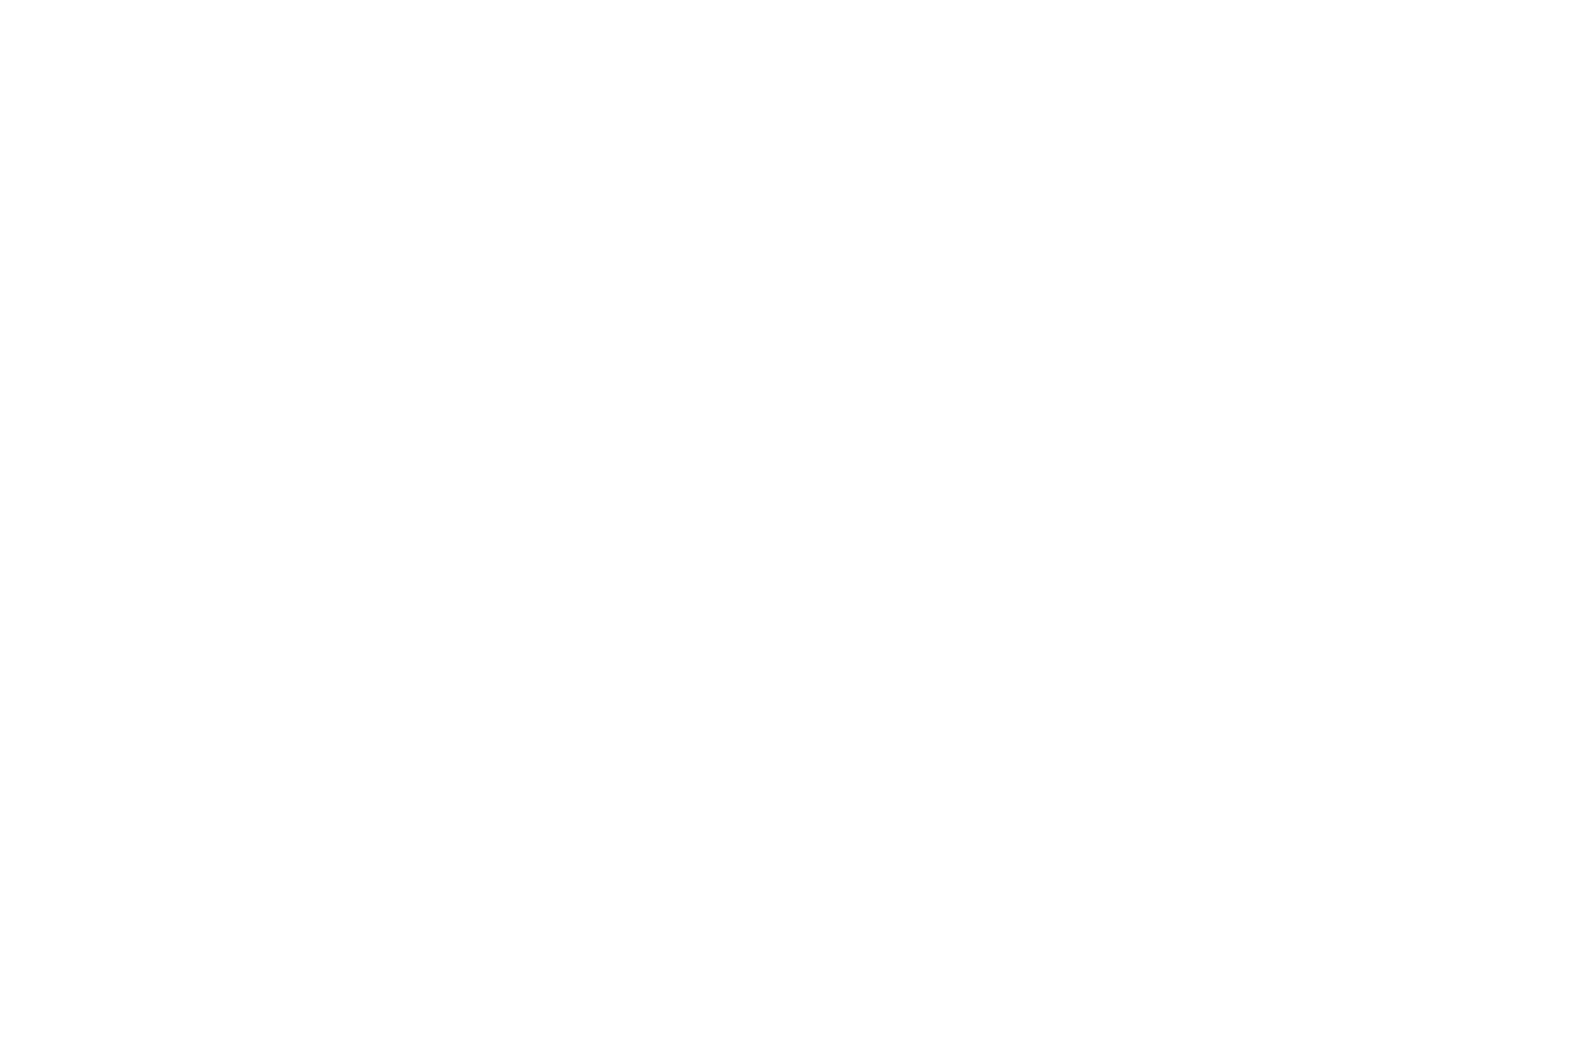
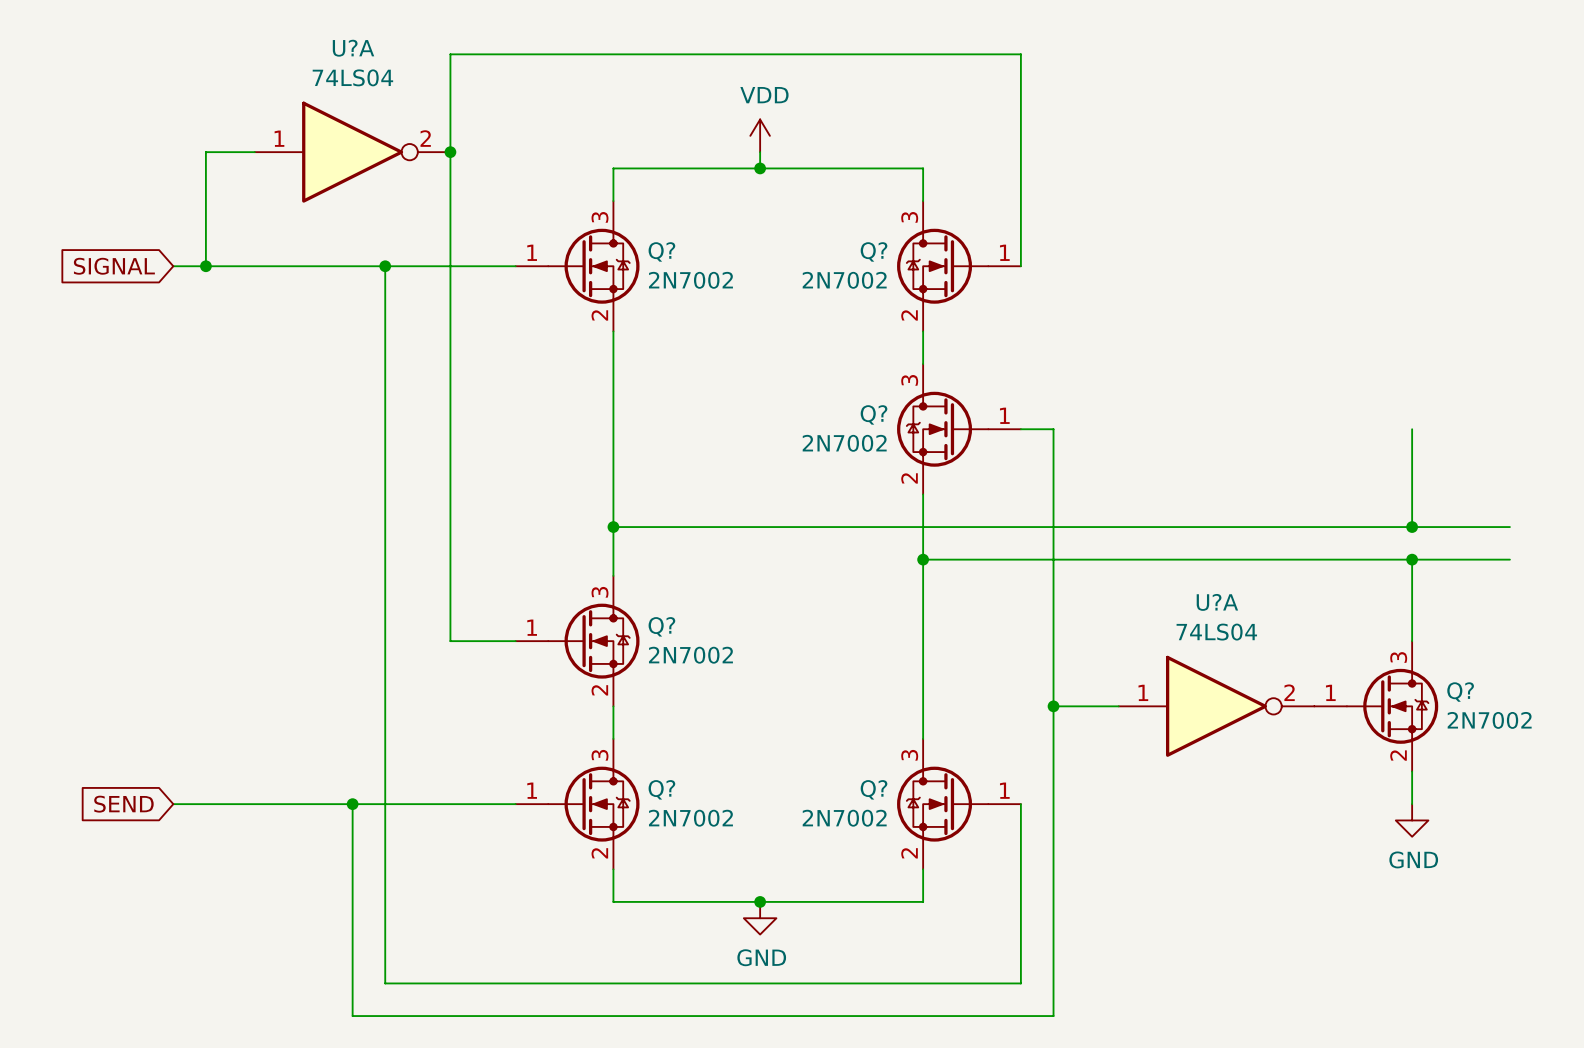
power symbol: none -> VDD (760, 135)
wire: none -> (254, 152) (205, 152) (205, 266)
U?A: none -> 74LS04 (352, 152)
junction: none -> (450, 152)
wire: none -> (760, 152) (760, 168)
junction: none -> (760, 168)
wire: none -> (613, 201) (613, 168) (923, 168) (923, 201)
global label: none -> SIGNAL (114, 266)
wire: none -> (173, 266) (515, 266)
junction: none -> (205, 266)
wire: none -> (385, 266) (385, 983) (1020, 983) (1020, 804)
junction: none -> (385, 266)
Q?: none -> 2N7002 (577, 266)
Q?: none -> 2N7002 (958, 266)
wire: none -> (1020, 266) (1020, 54) (450, 54) (450, 641) (515, 641)
wire: none -> (613, 331) (613, 575)
wire: none -> (923, 331) (923, 364)
Q?: none -> 2N7002 (958, 429)
wire: none -> (1020, 429) (1053, 429) (1053, 1016) (352, 1016) (352, 804)
wire: none -> (1412, 429) (1412, 527)
wire: none -> (923, 494) (923, 738)
wire: none -> (613, 527) (1509, 527)
junction: none -> (613, 527)
junction: none -> (1412, 527)
wire: none -> (923, 559) (1509, 559)
junction: none -> (923, 559)
wire: none -> (1412, 559) (1412, 641)
junction: none -> (1412, 559)
Q?: none -> 2N7002 (577, 641)
wire: none -> (613, 706) (613, 738)
wire: none -> (1053, 706) (1118, 706)
junction: none -> (1053, 706)
U?A: none -> 74LS04 (1216, 706)
Q?: none -> 2N7002 (1376, 706)
wire: none -> (1412, 771) (1412, 804)
global label: none -> SEND (123, 804)
wire: none -> (173, 804) (515, 804)
junction: none -> (352, 804)
Q?: none -> 2N7002 (577, 804)
Q?: none -> 2N7002 (958, 804)
power symbol: none -> GND (1412, 820)
wire: none -> (613, 869) (613, 901) (923, 901) (923, 869)
junction: none -> (760, 901)
power symbol: none -> GND (760, 918)

